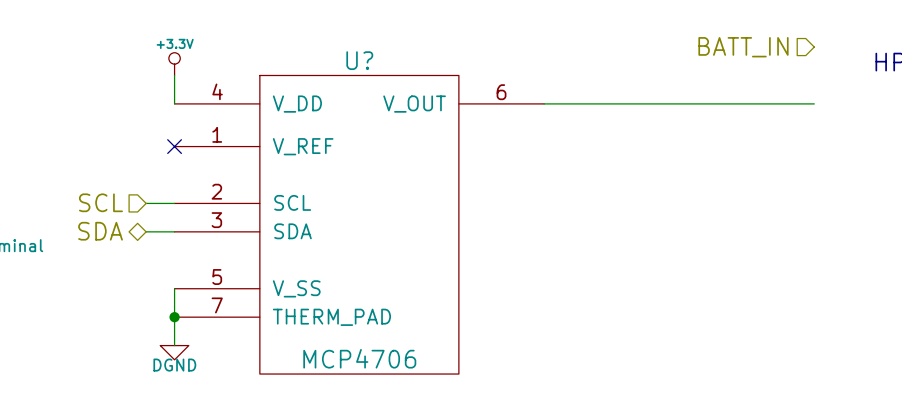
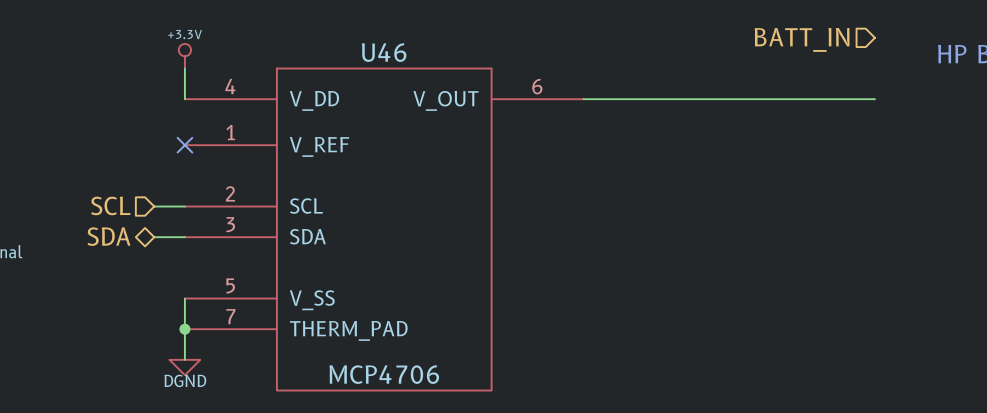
U? name: U? (359, 60) -> U46 (384, 52)

